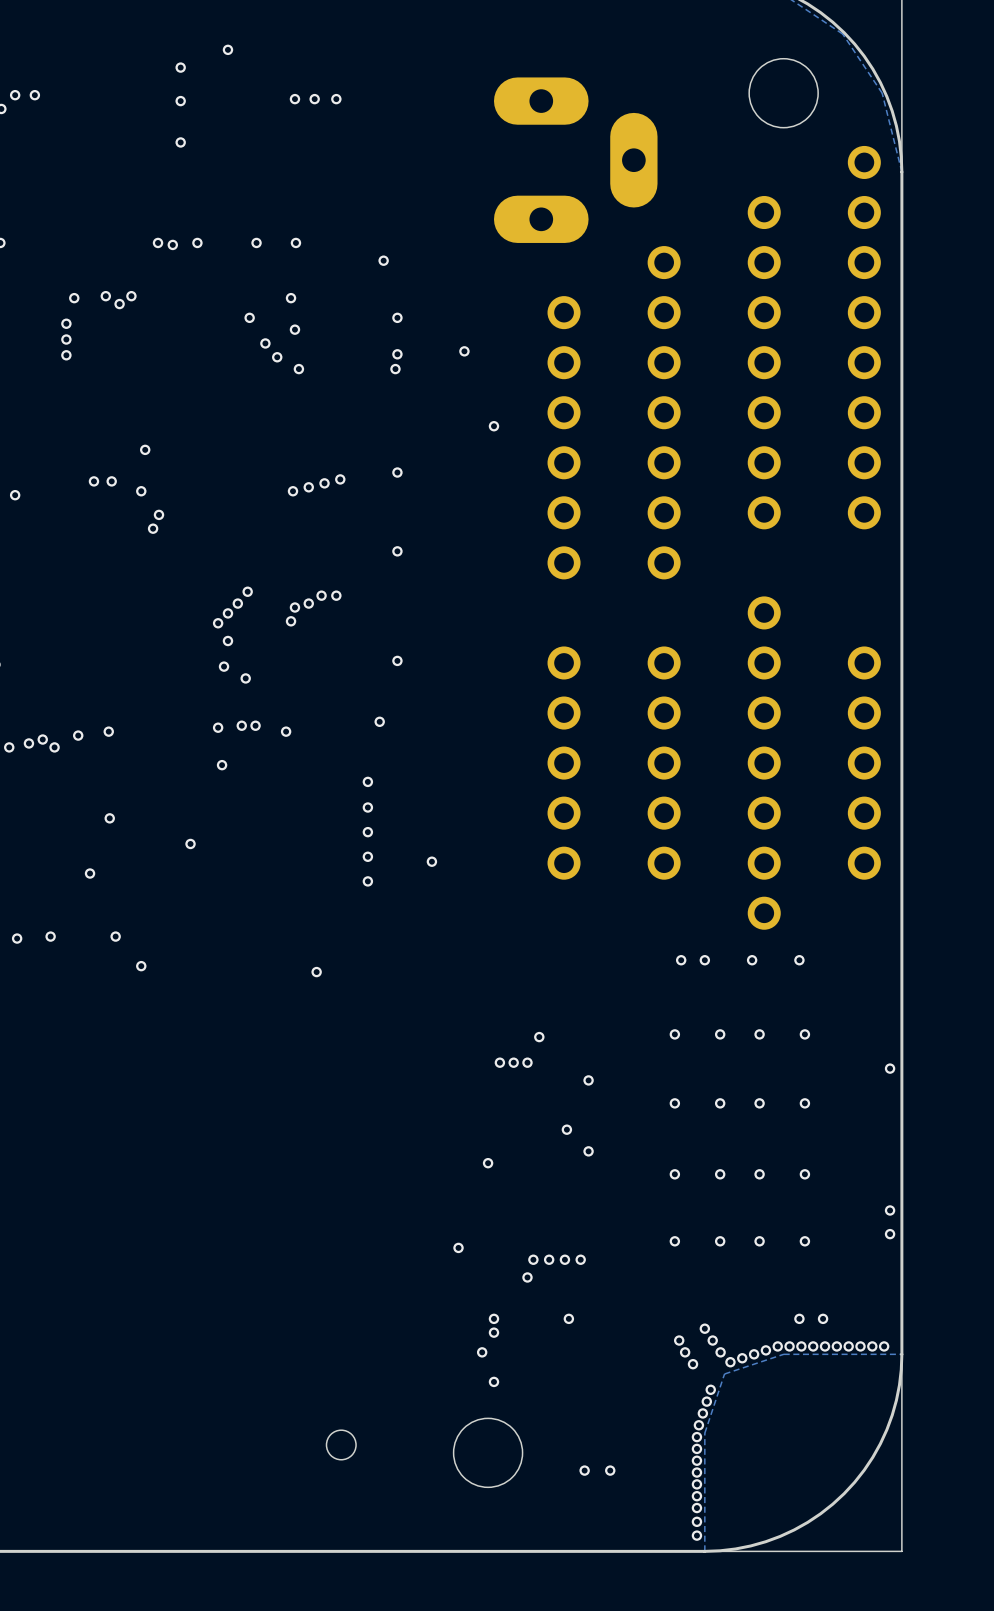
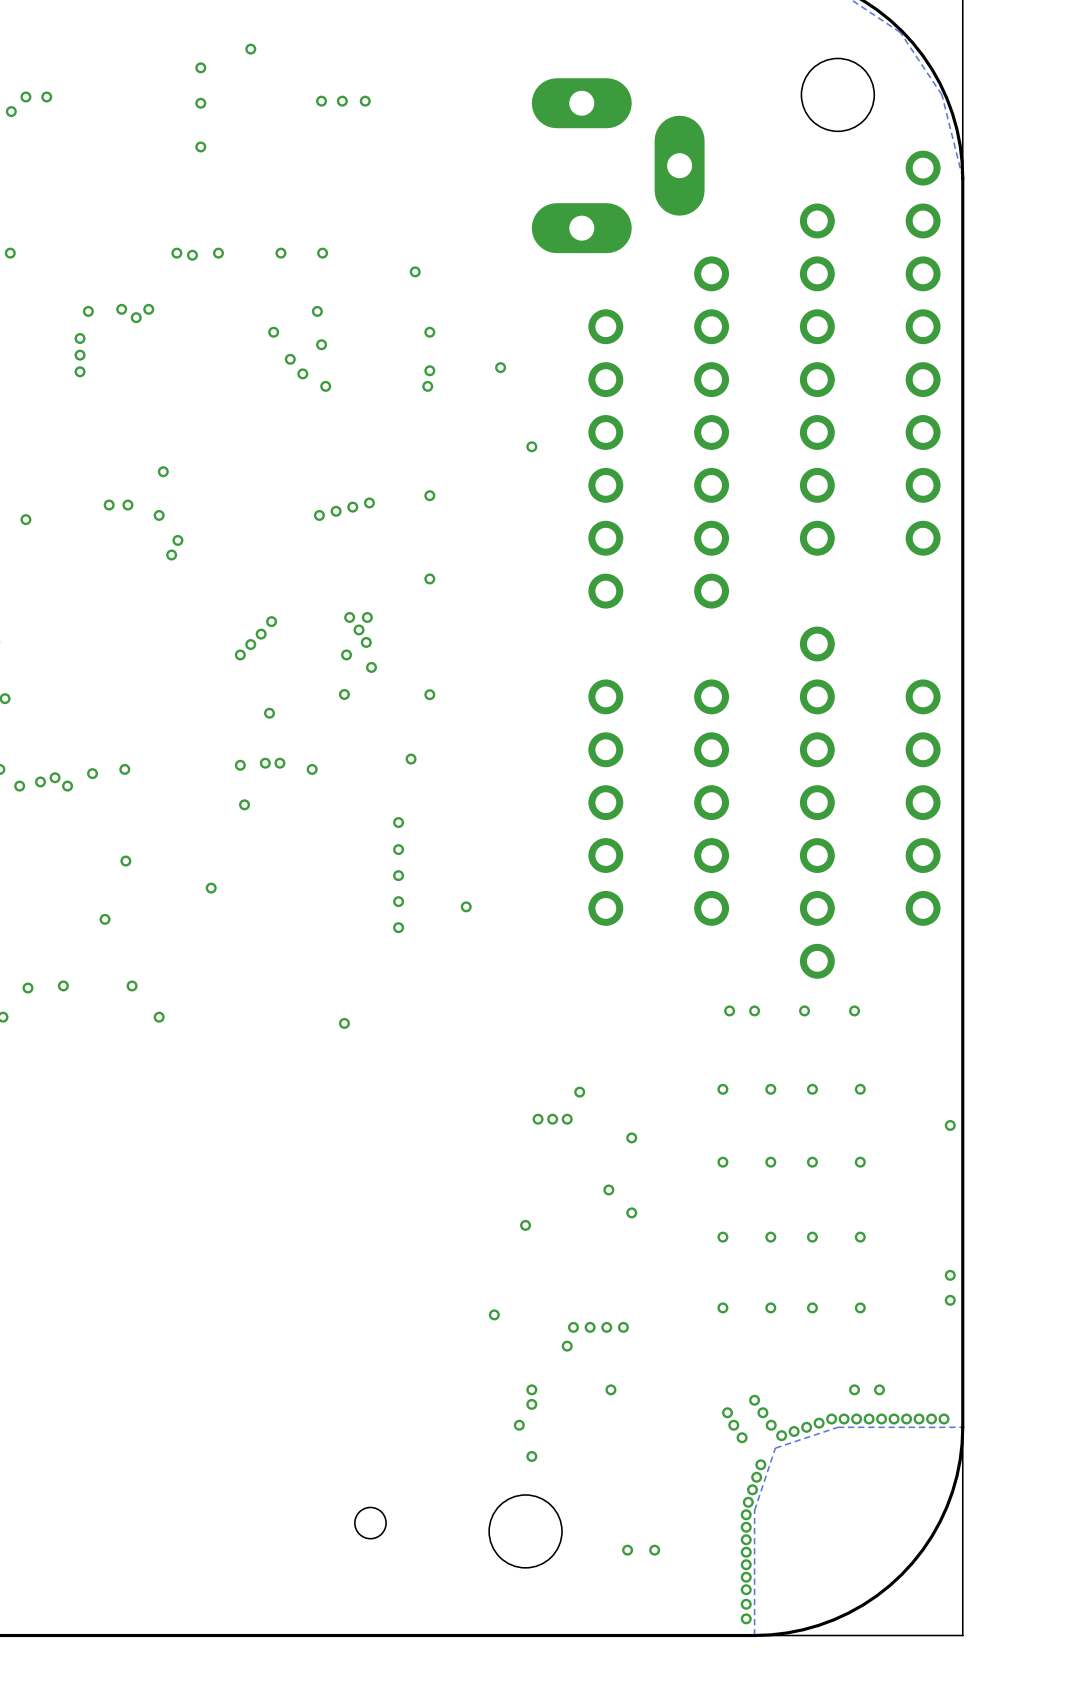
via: none -> (349, 617)
via: none -> (367, 617)
via: (321, 595) -> none
via: (336, 595) -> none
via: none -> (359, 629)
via: (308, 603) -> none
via: (294, 607) -> none
via: none -> (366, 642)
via: (291, 621) -> none
via: none -> (346, 654)
via: none -> (371, 667)
via: (227, 641) -> none
via: none -> (344, 694)
via: (224, 666) -> none

